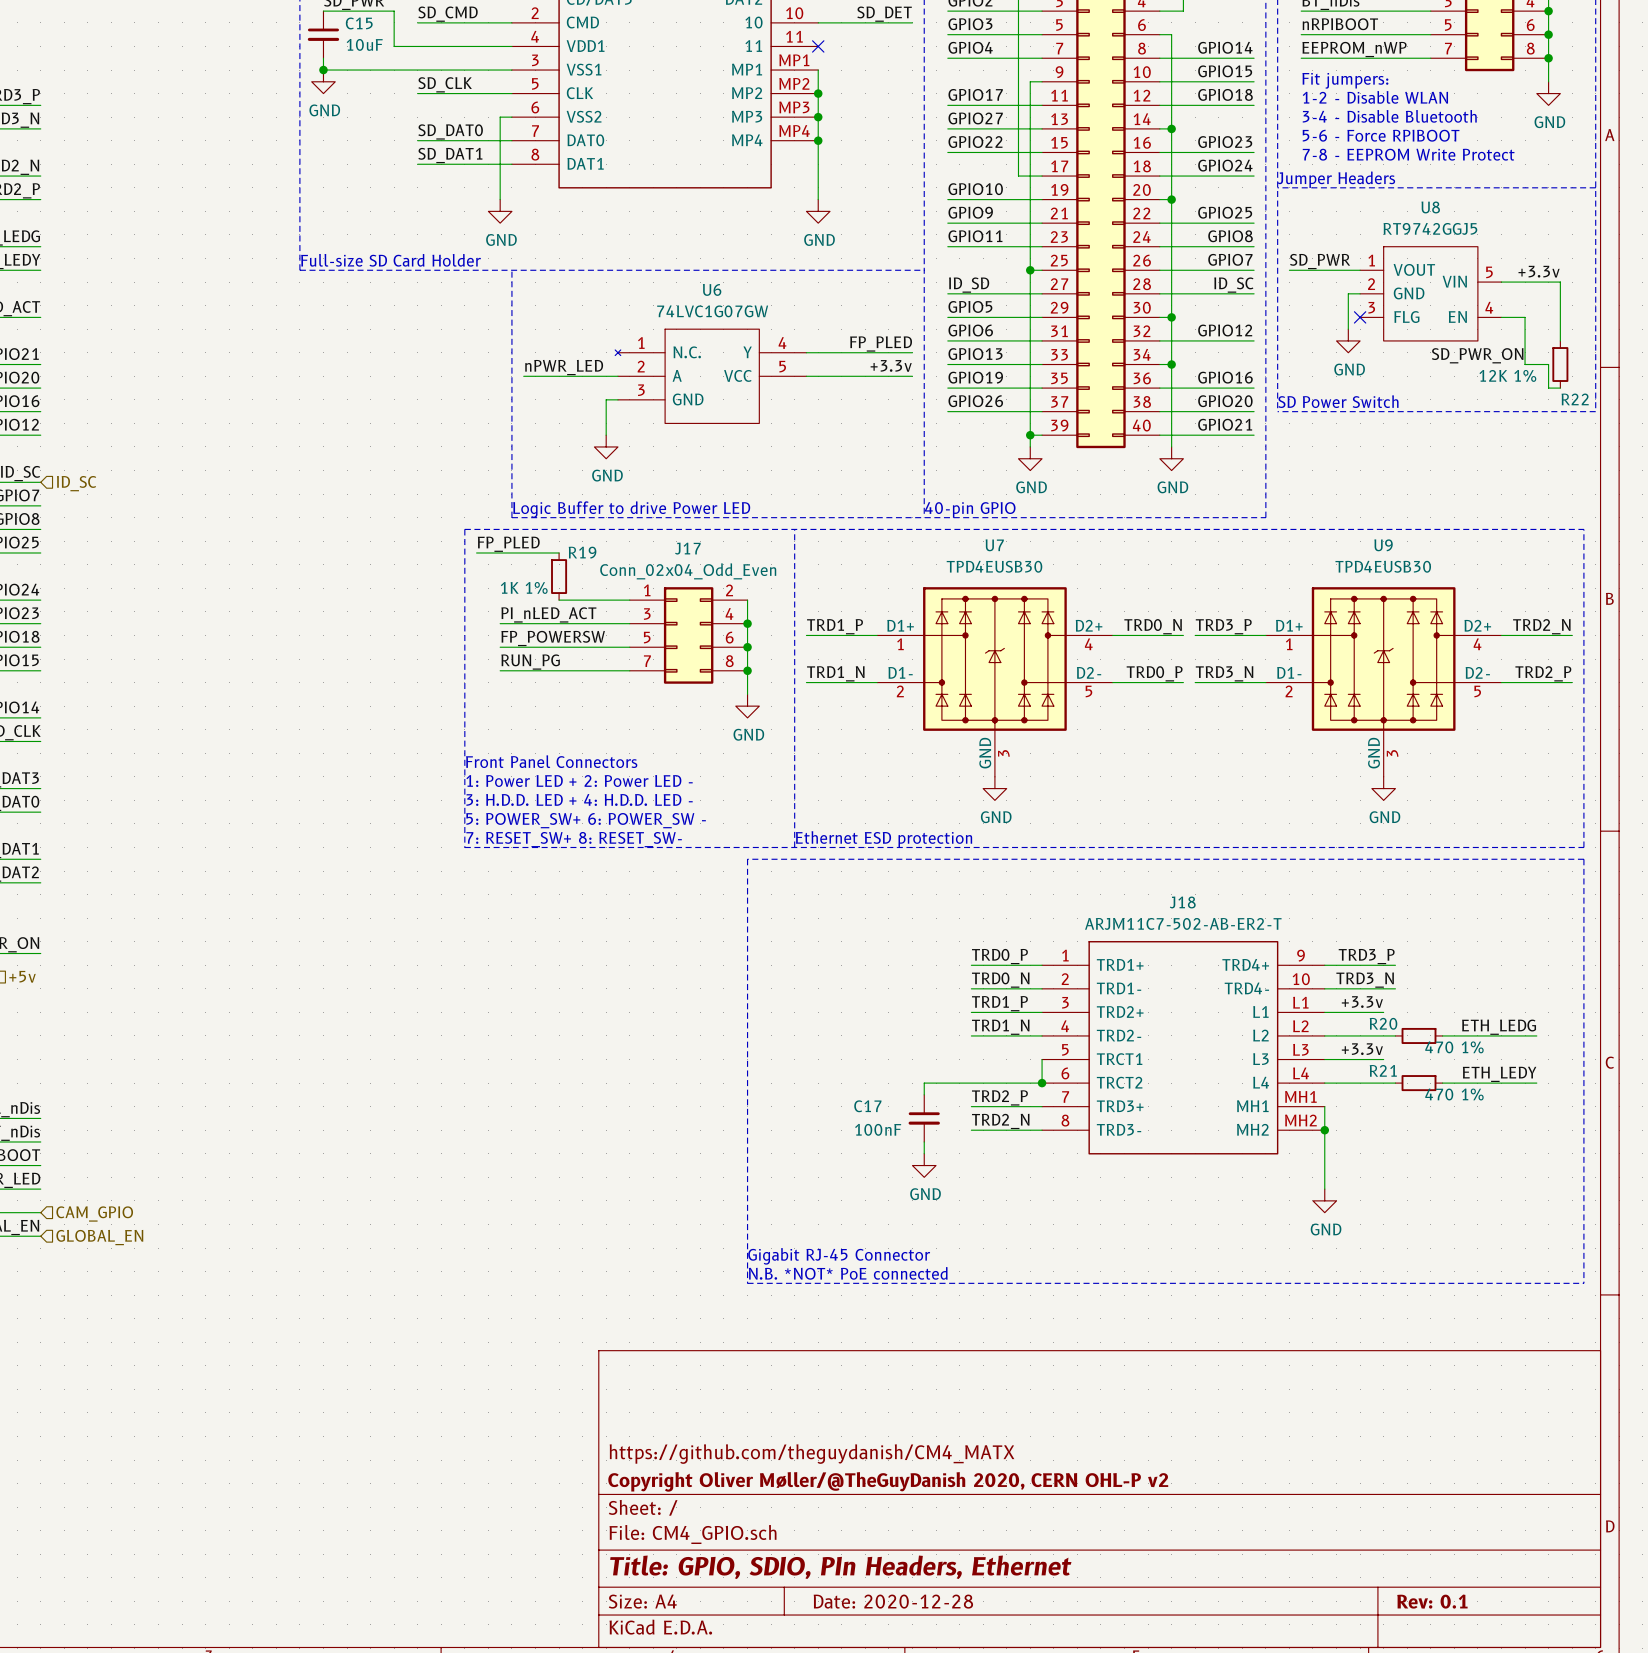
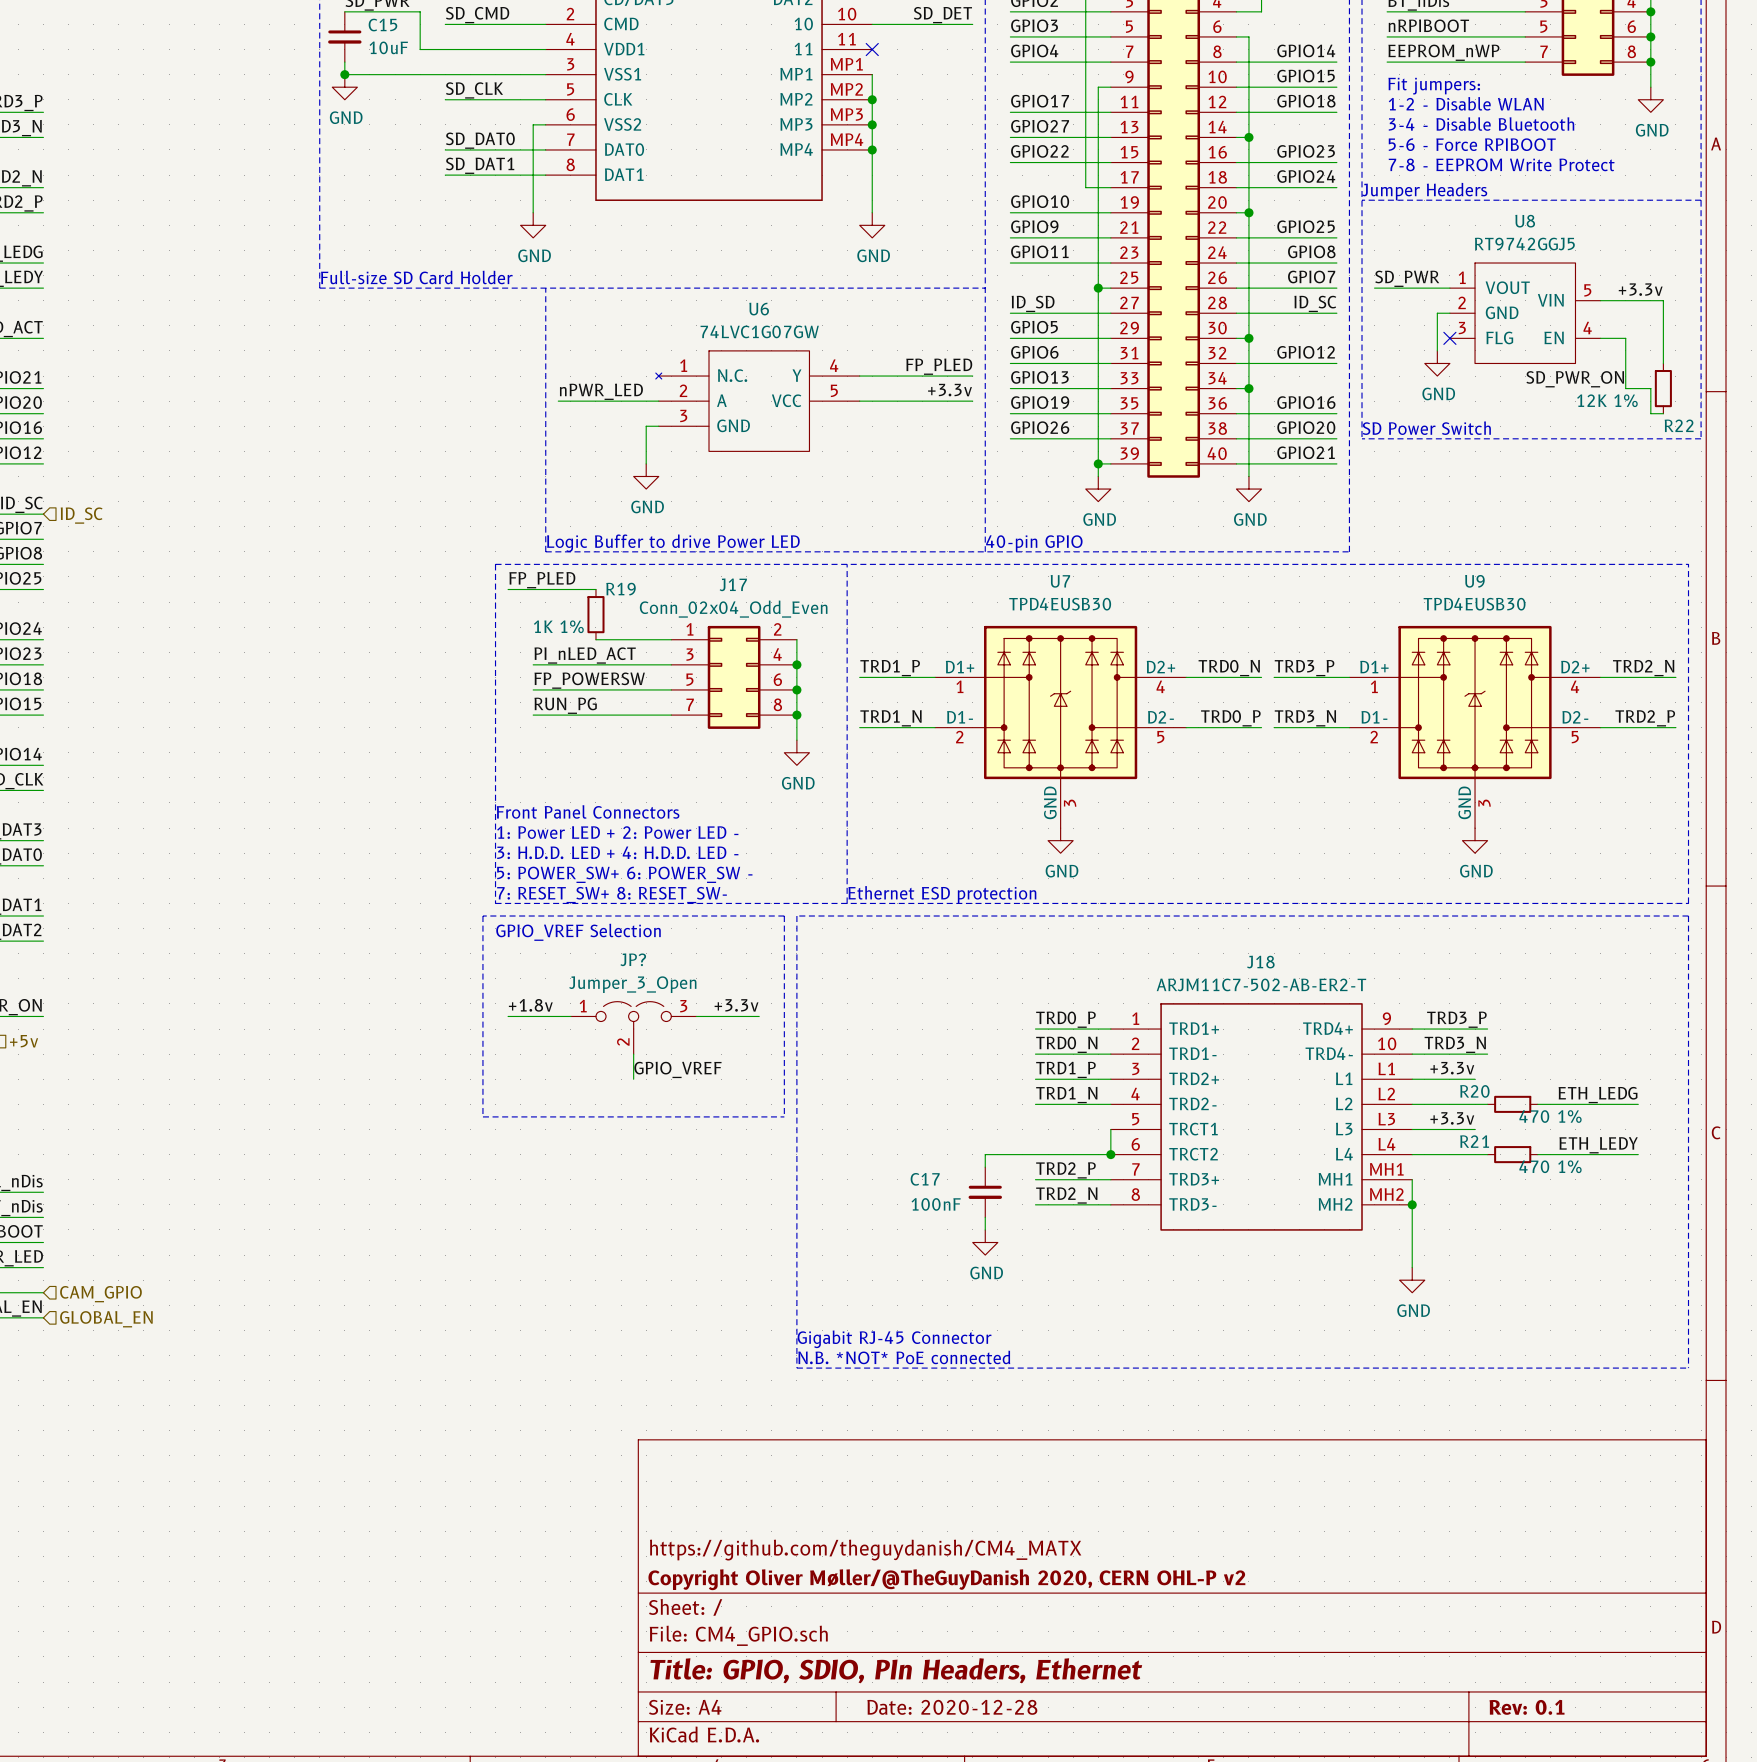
line: none -> (482, 916) (784, 916) (784, 1116) (482, 1116) (482, 916)
text: none -> GPIO_VREF Selection (578, 932)
label: none -> +1.8v (530, 1005)
label: none -> +3.3v (736, 1005)
wire: none -> (508, 1016) (570, 1016)
wire: none -> (696, 1016) (759, 1016)
JP?: none -> Jumper_3_Open (633, 1027)
wire: none -> (633, 1054) (633, 1079)
label: none -> GPIO_VREF (677, 1069)

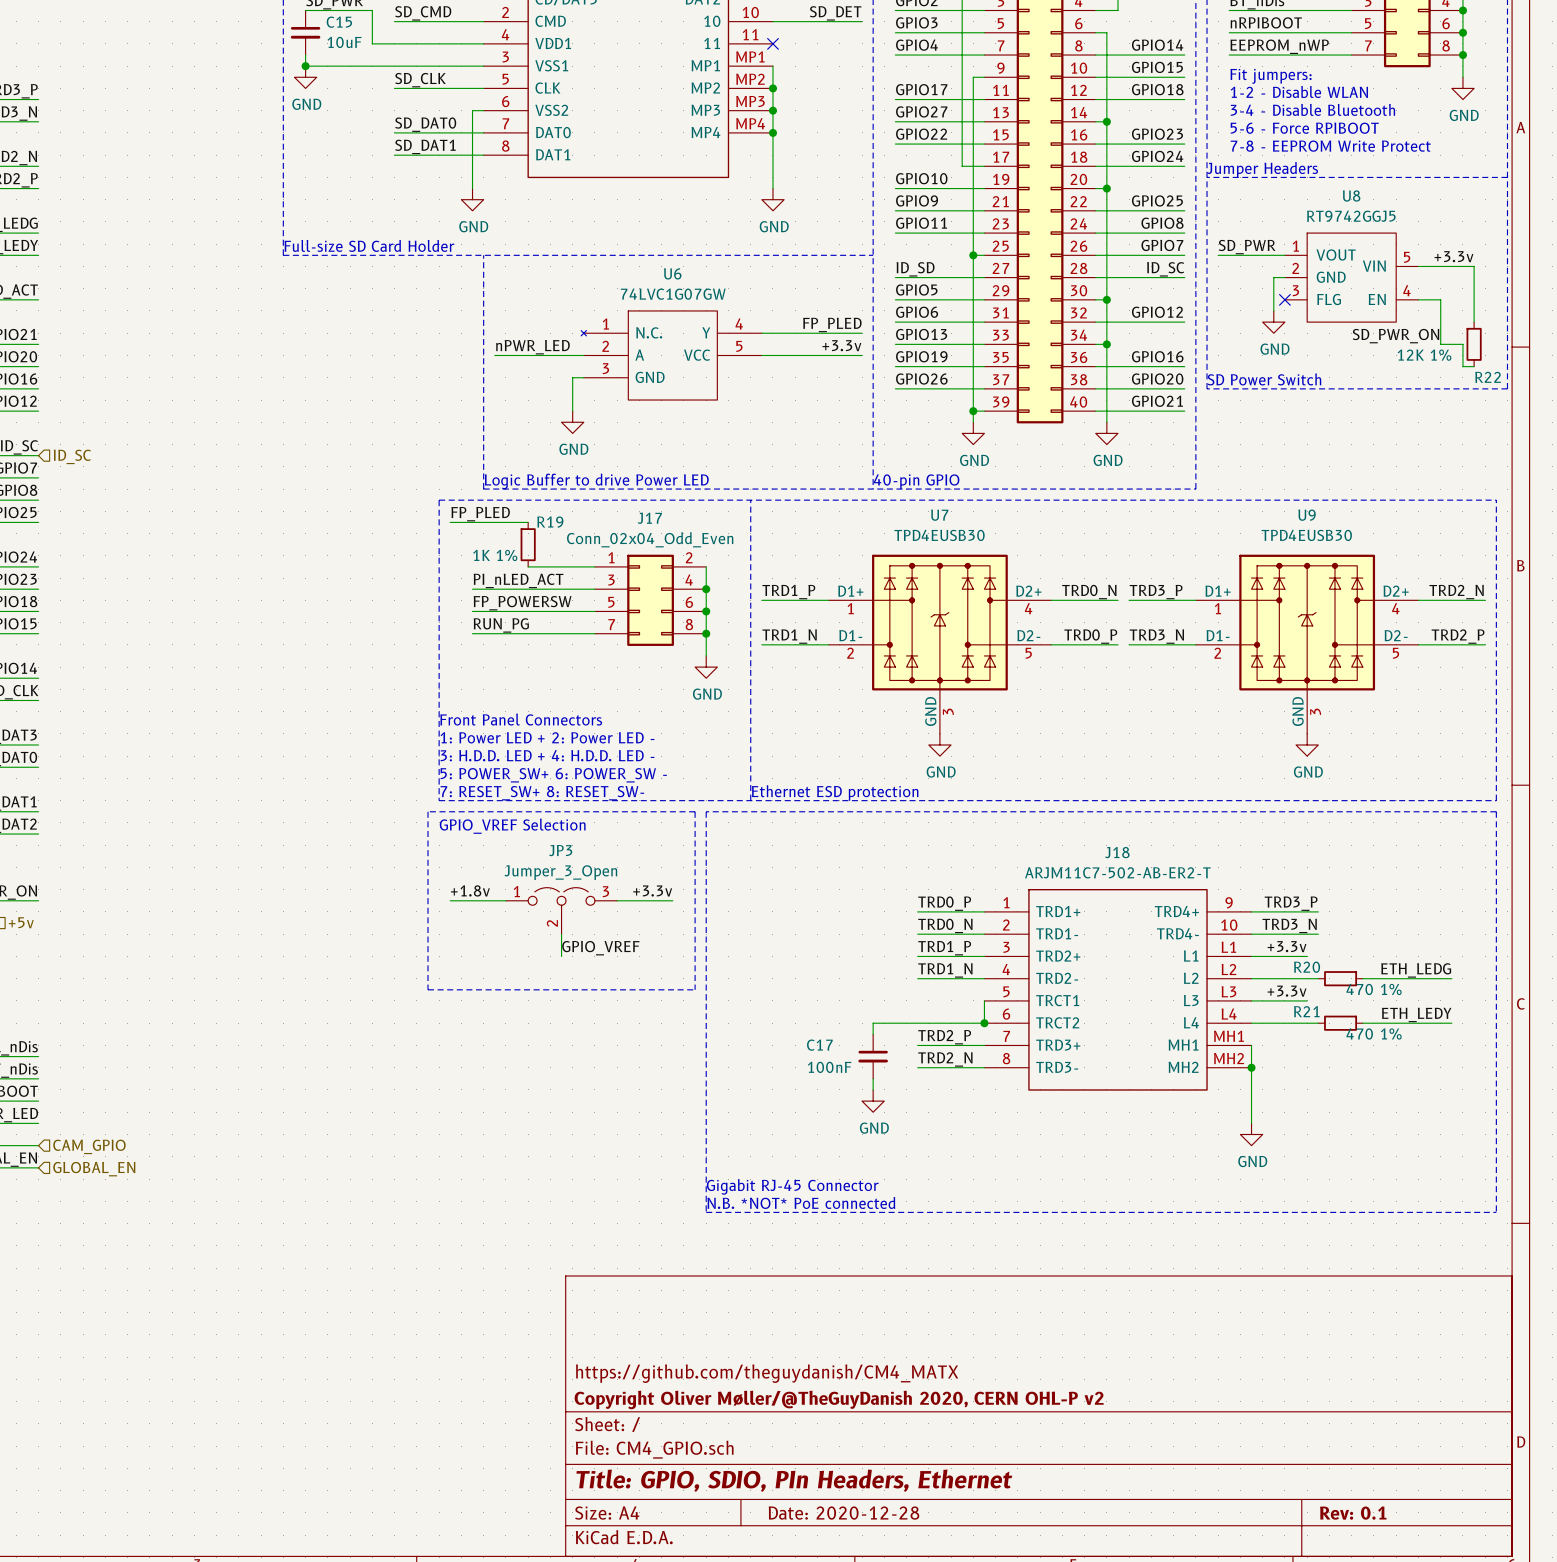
JP? name: JP? (633, 959) -> JP3 (560, 850)

